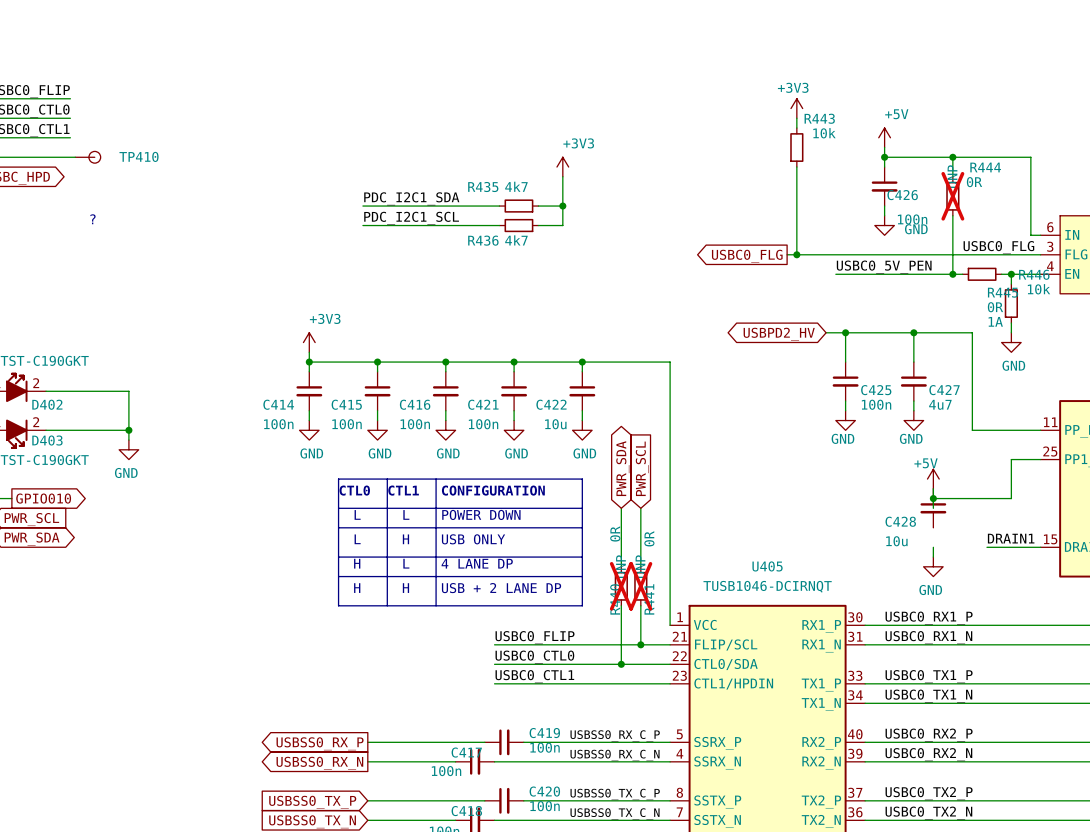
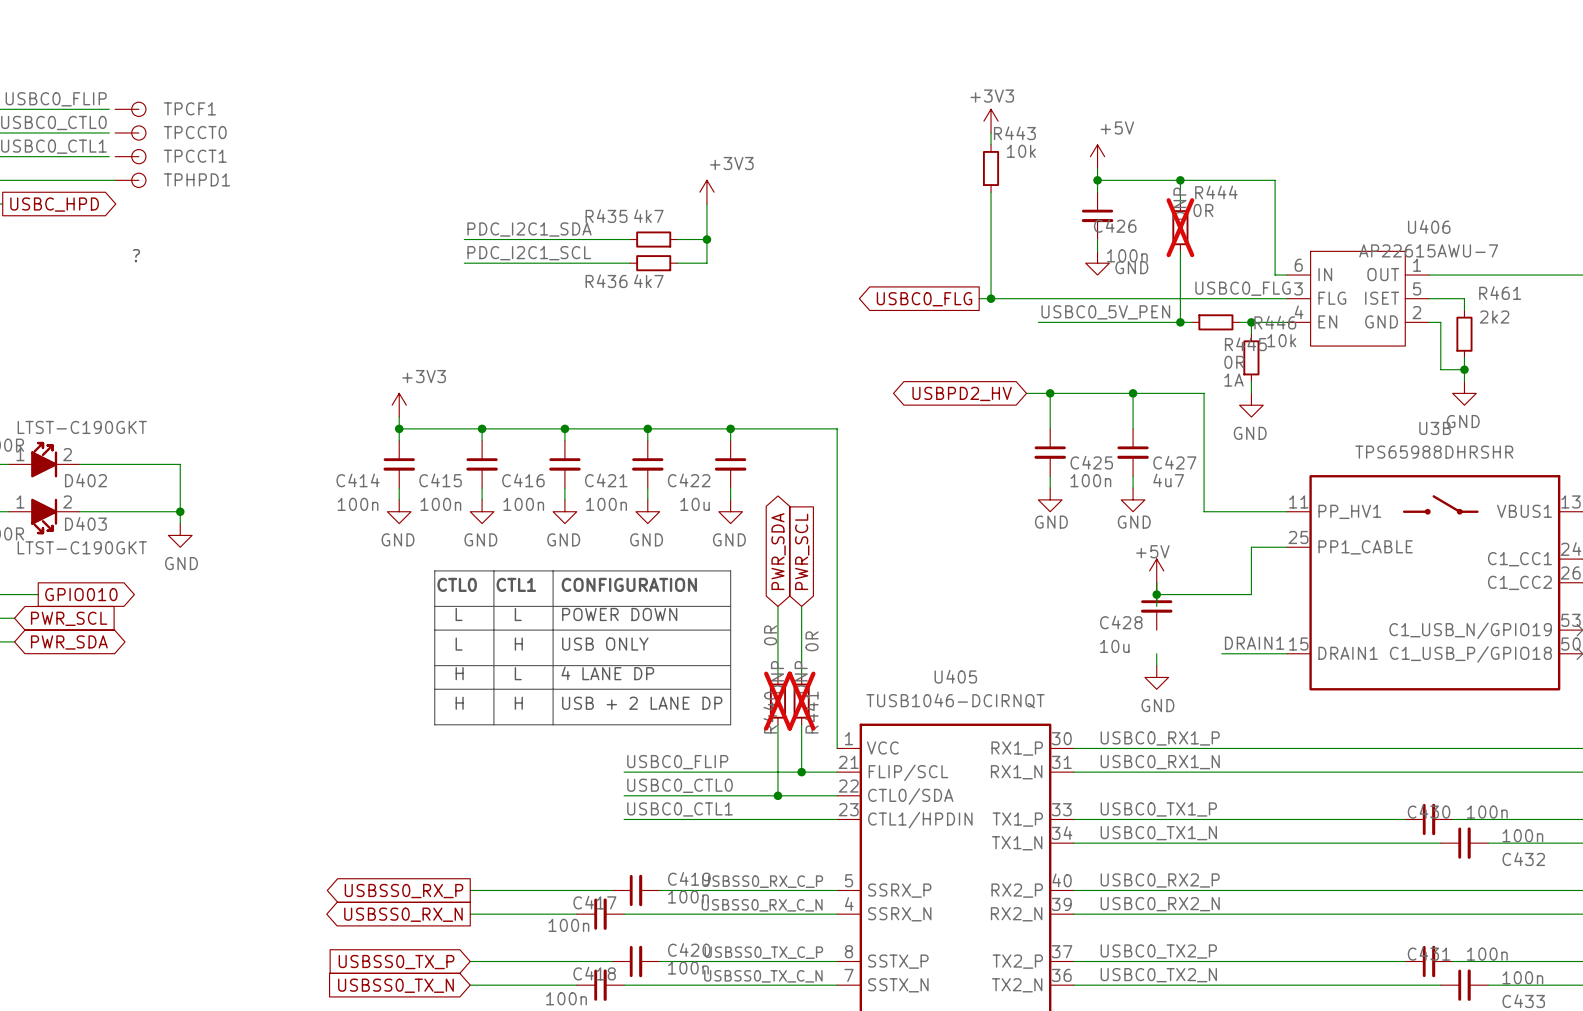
TPCF1: none -> (130, 109)
TPCCT0: none -> (130, 132)
TPCCT1: none -> (130, 156)
TP410 name: TP410 (139, 156) -> TPHPD1 (196, 179)

